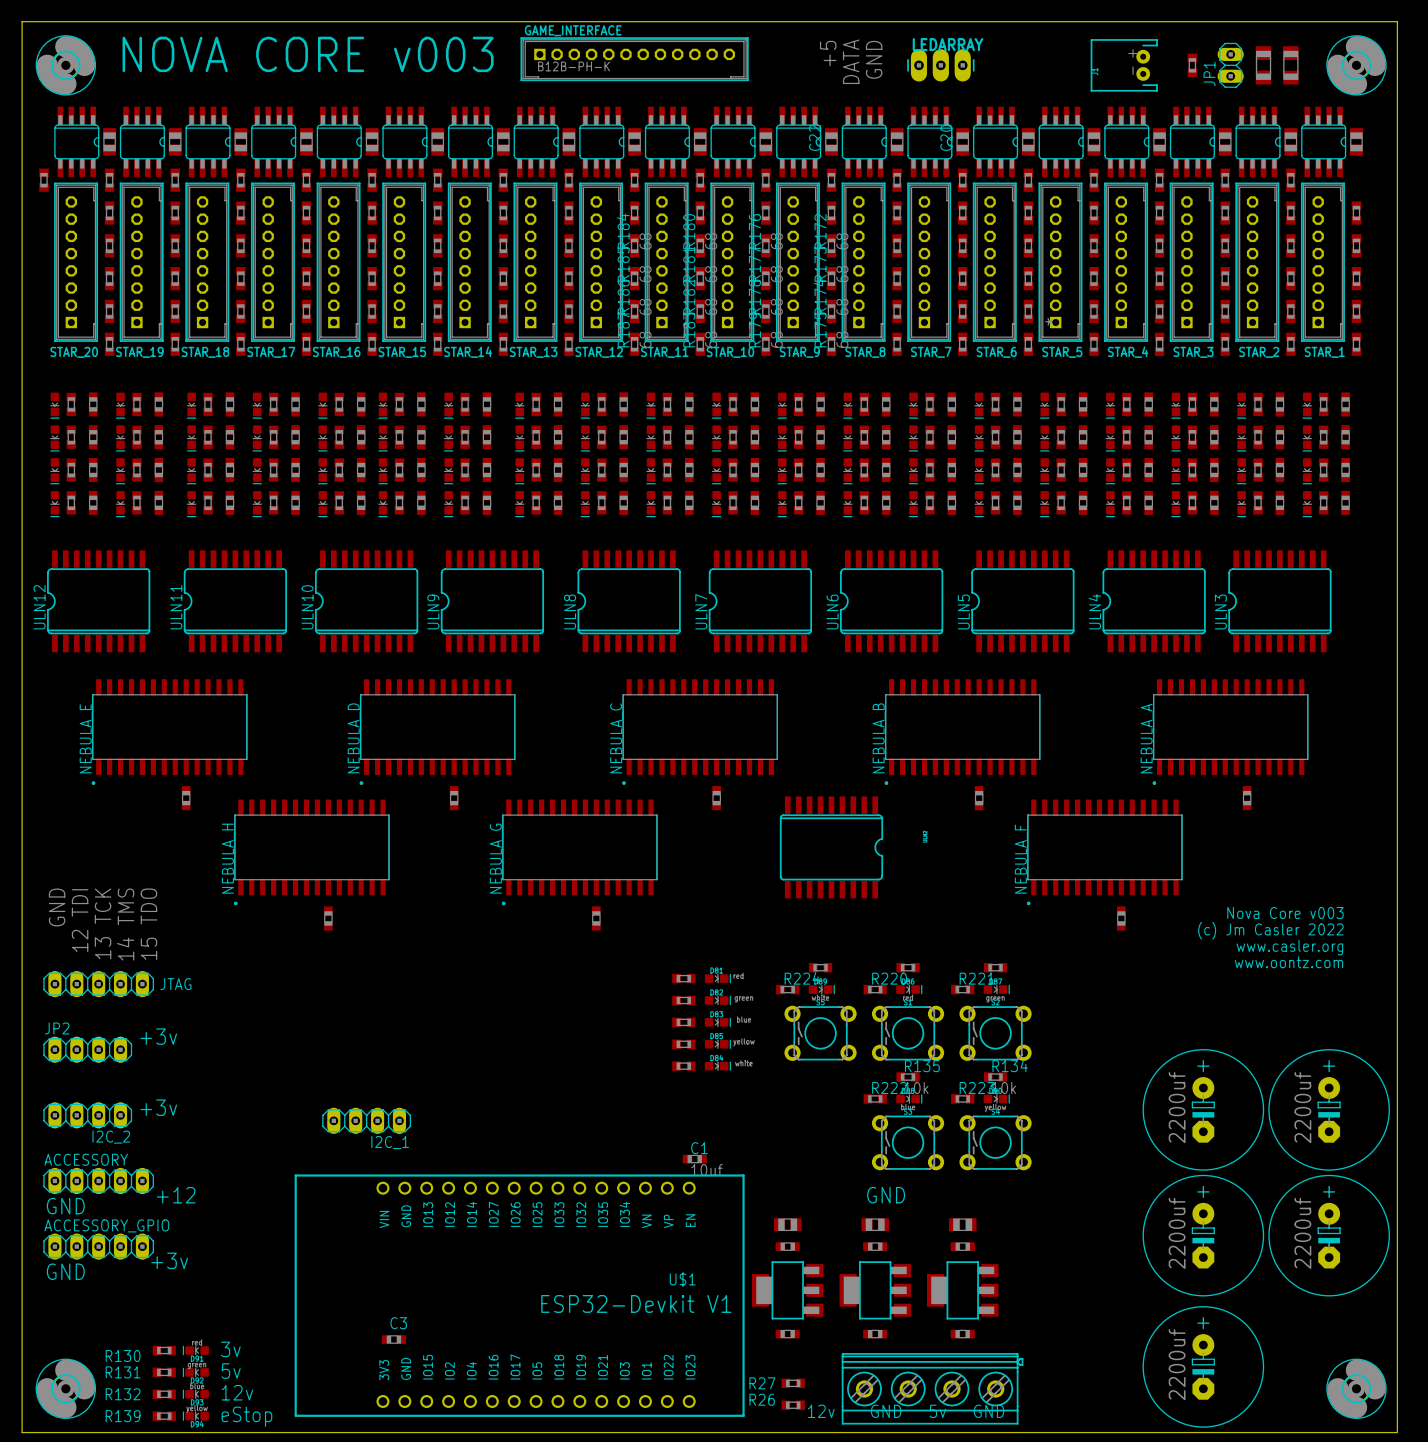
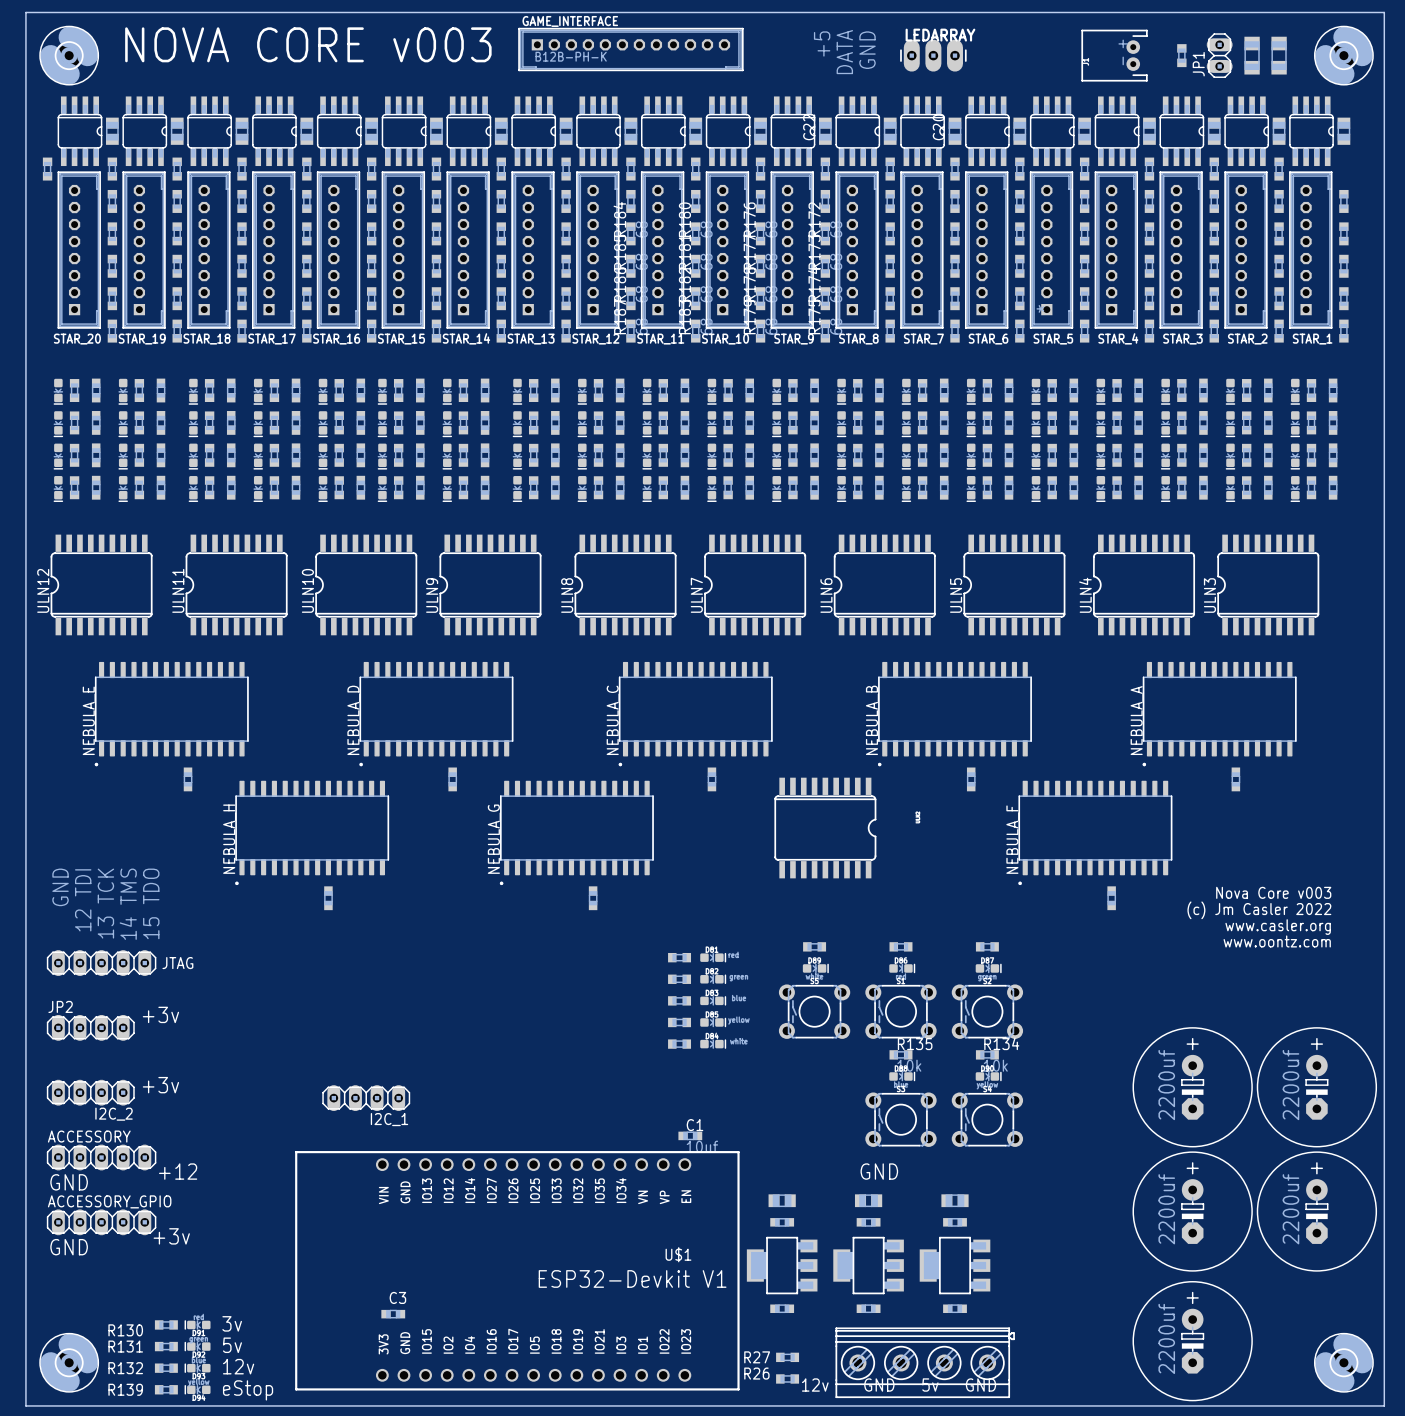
R224: (787, 989) -> none
R220: (875, 989) -> none
R221: (962, 989) -> none
R222: (875, 1098) -> none
R223: (962, 1098) -> none

